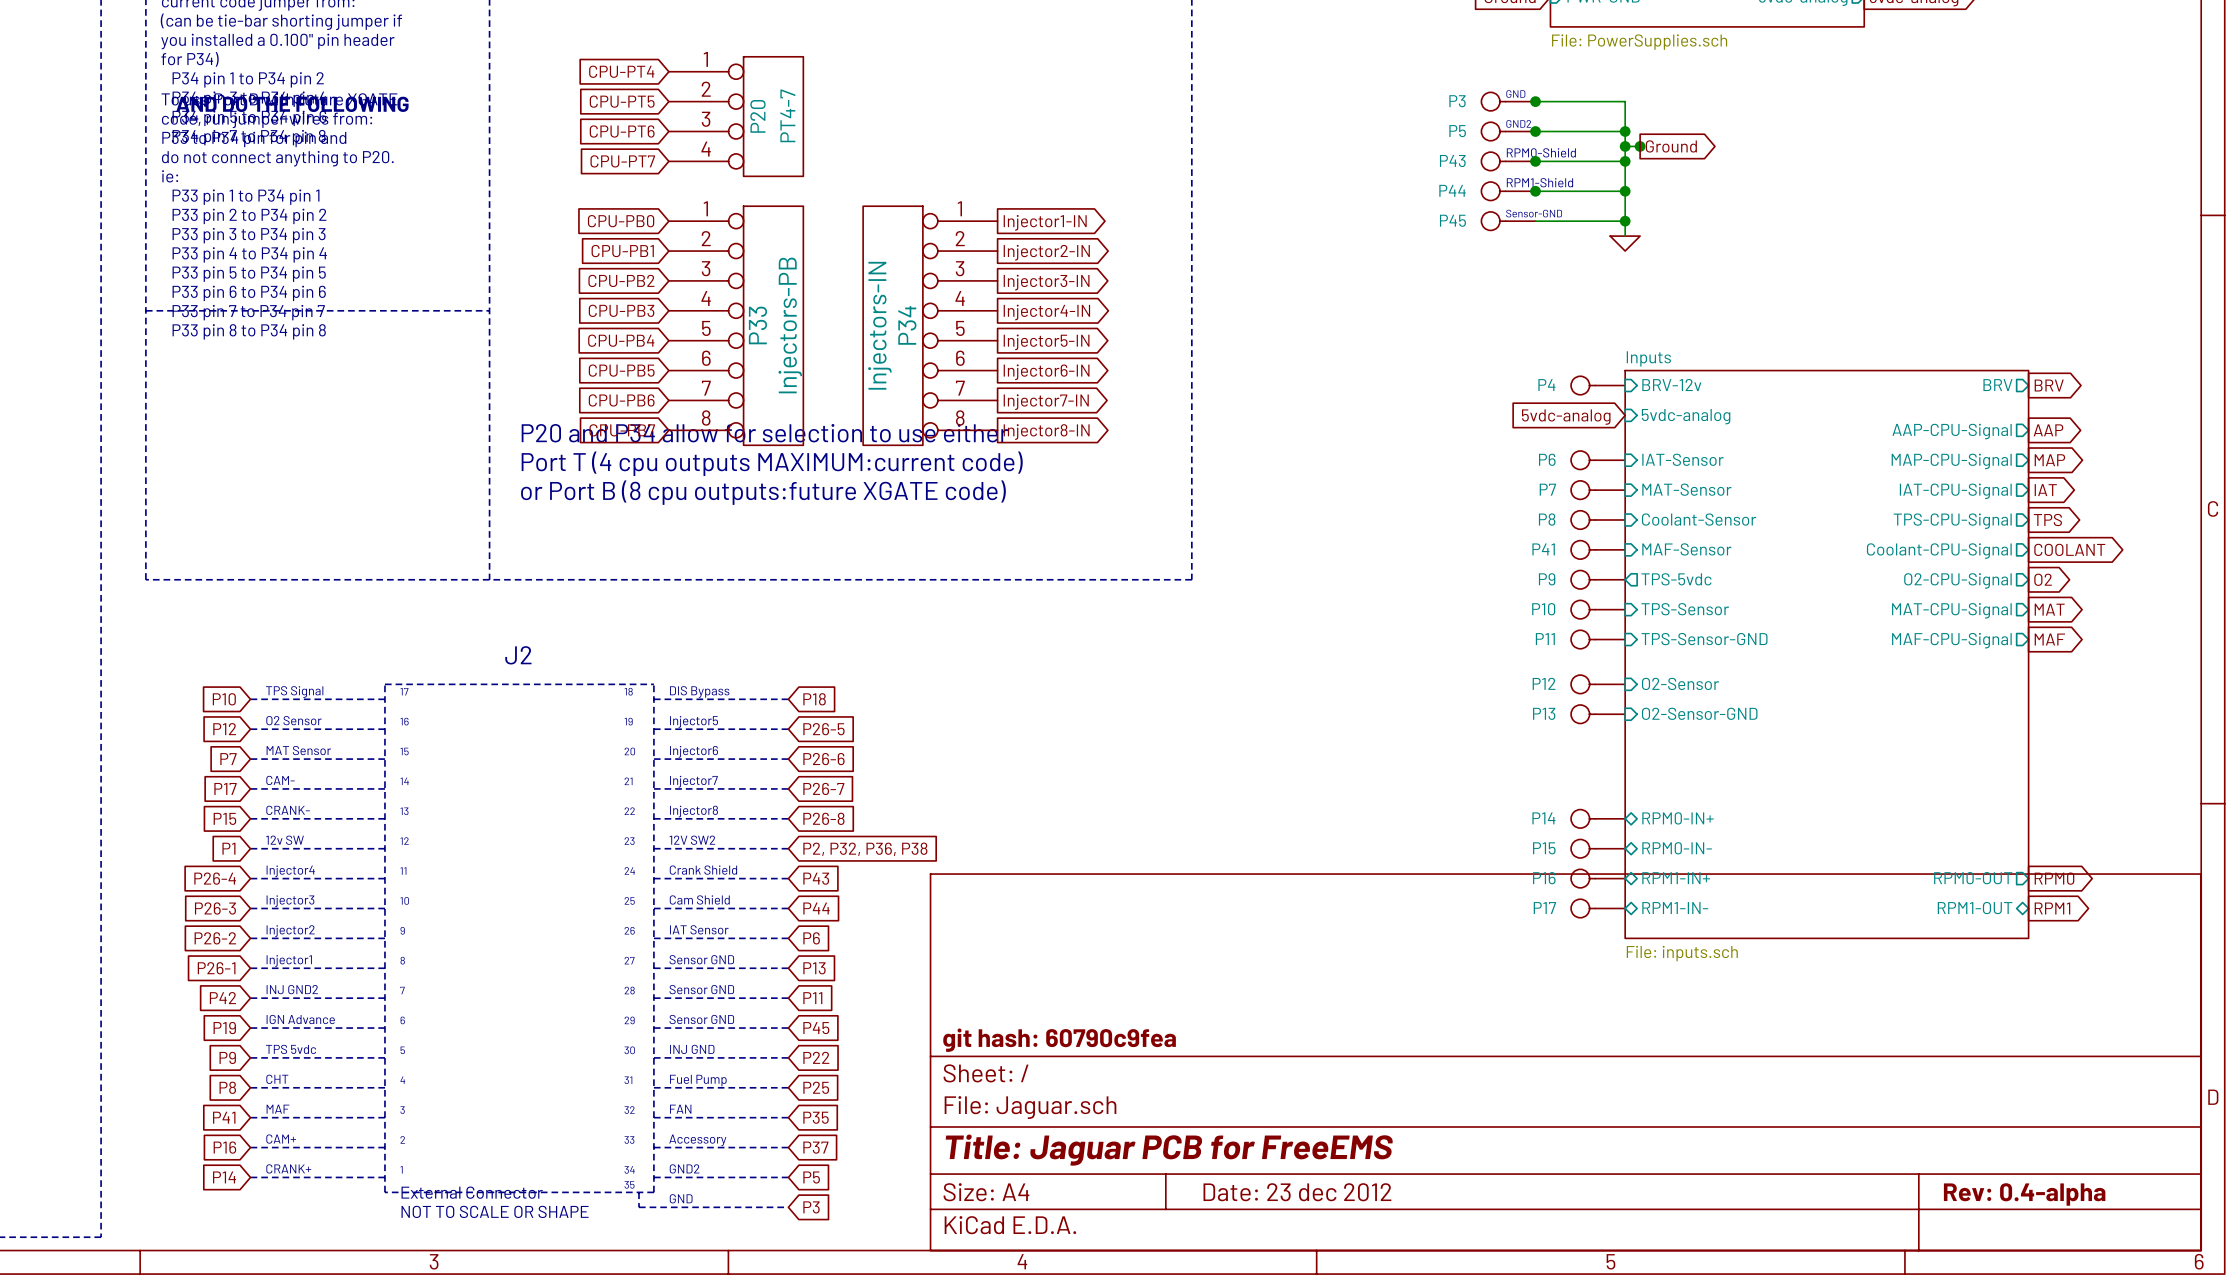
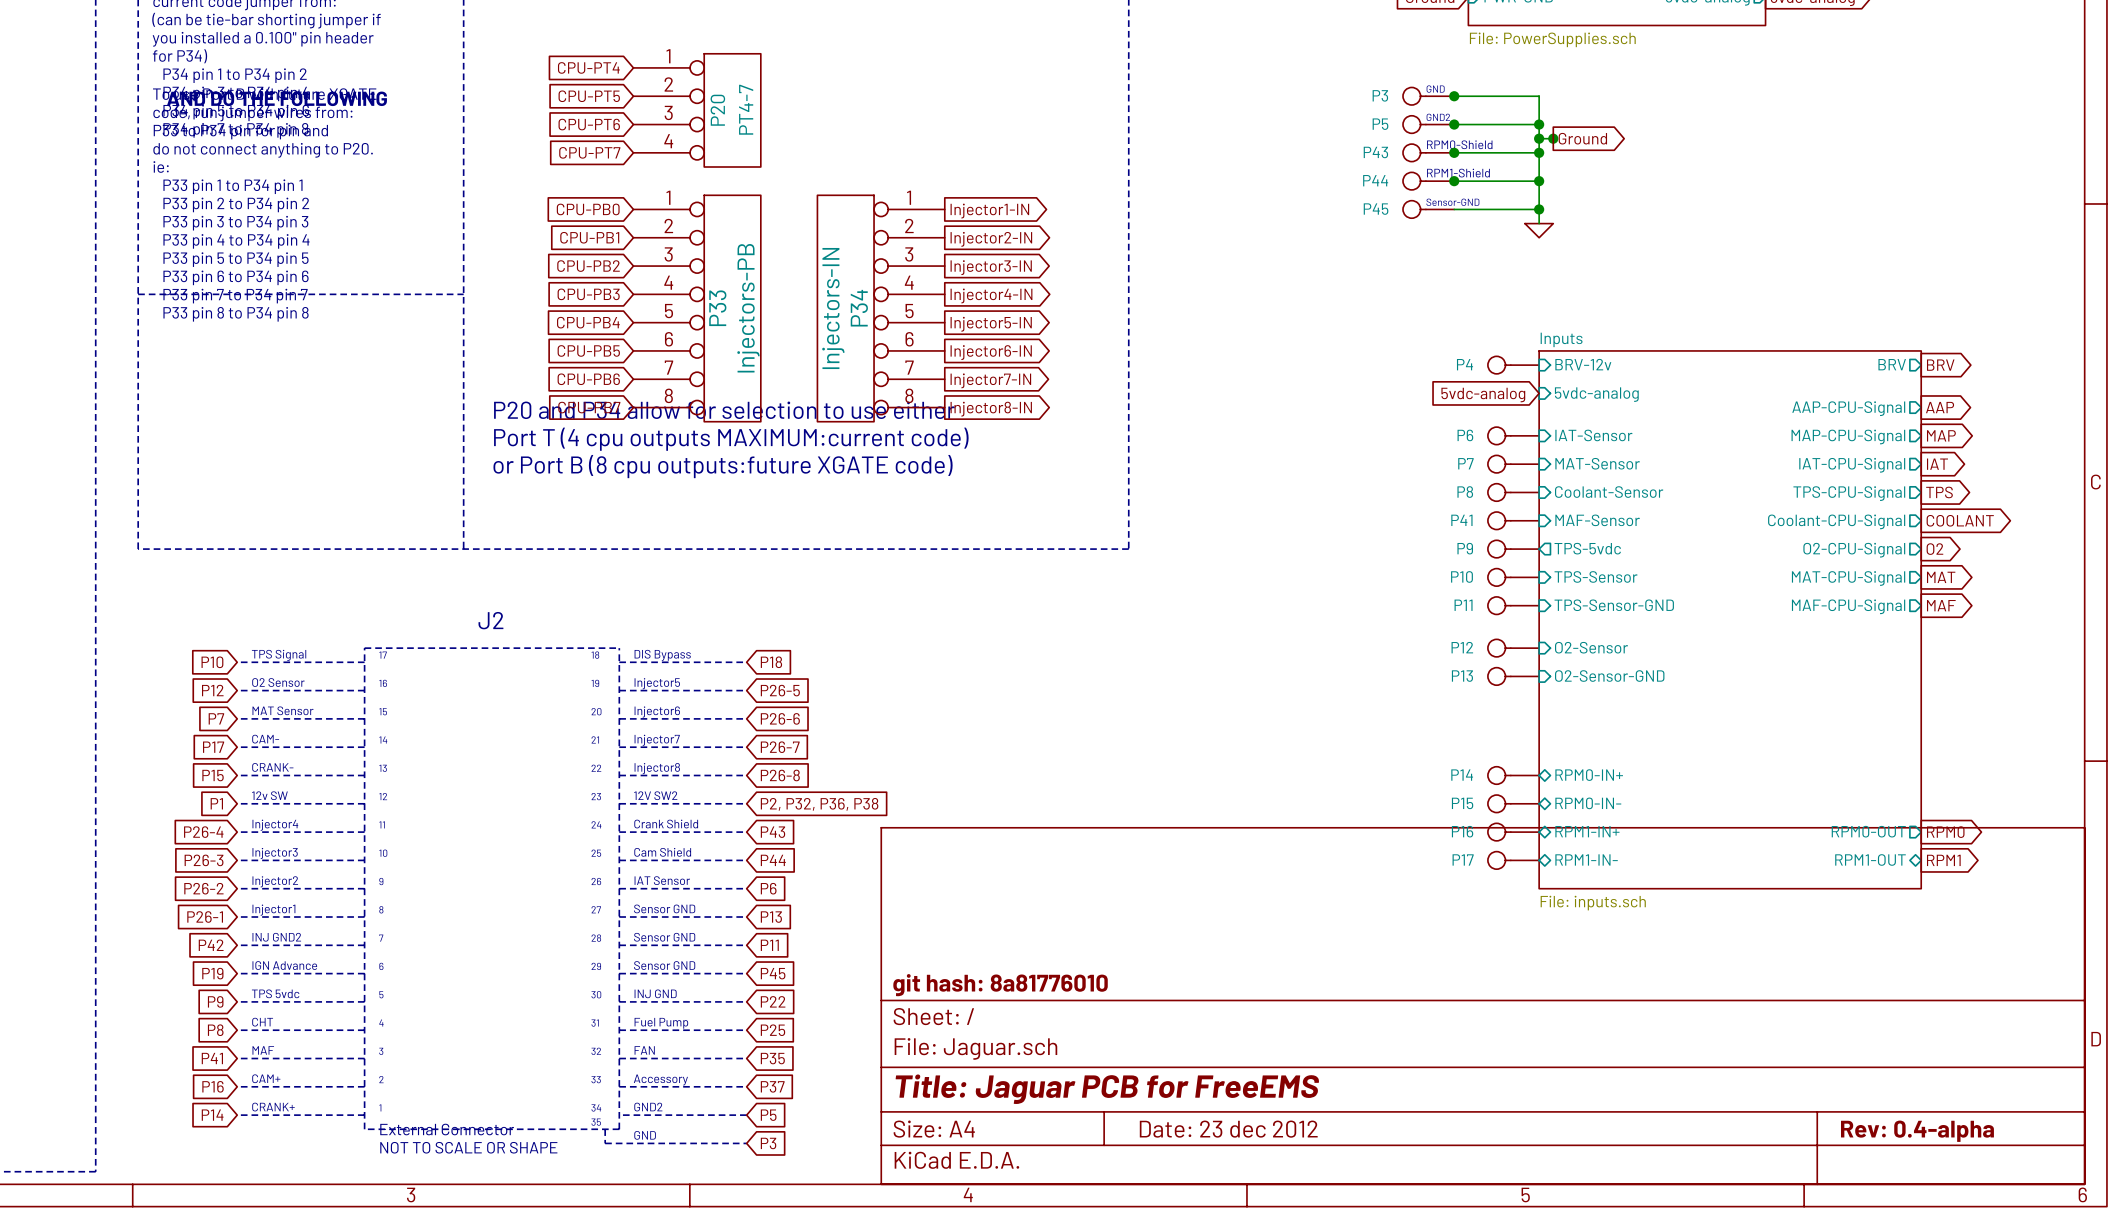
title block: git hash: 60790c9fea (1059, 1040) -> git hash: 8a81776010 (1000, 985)

